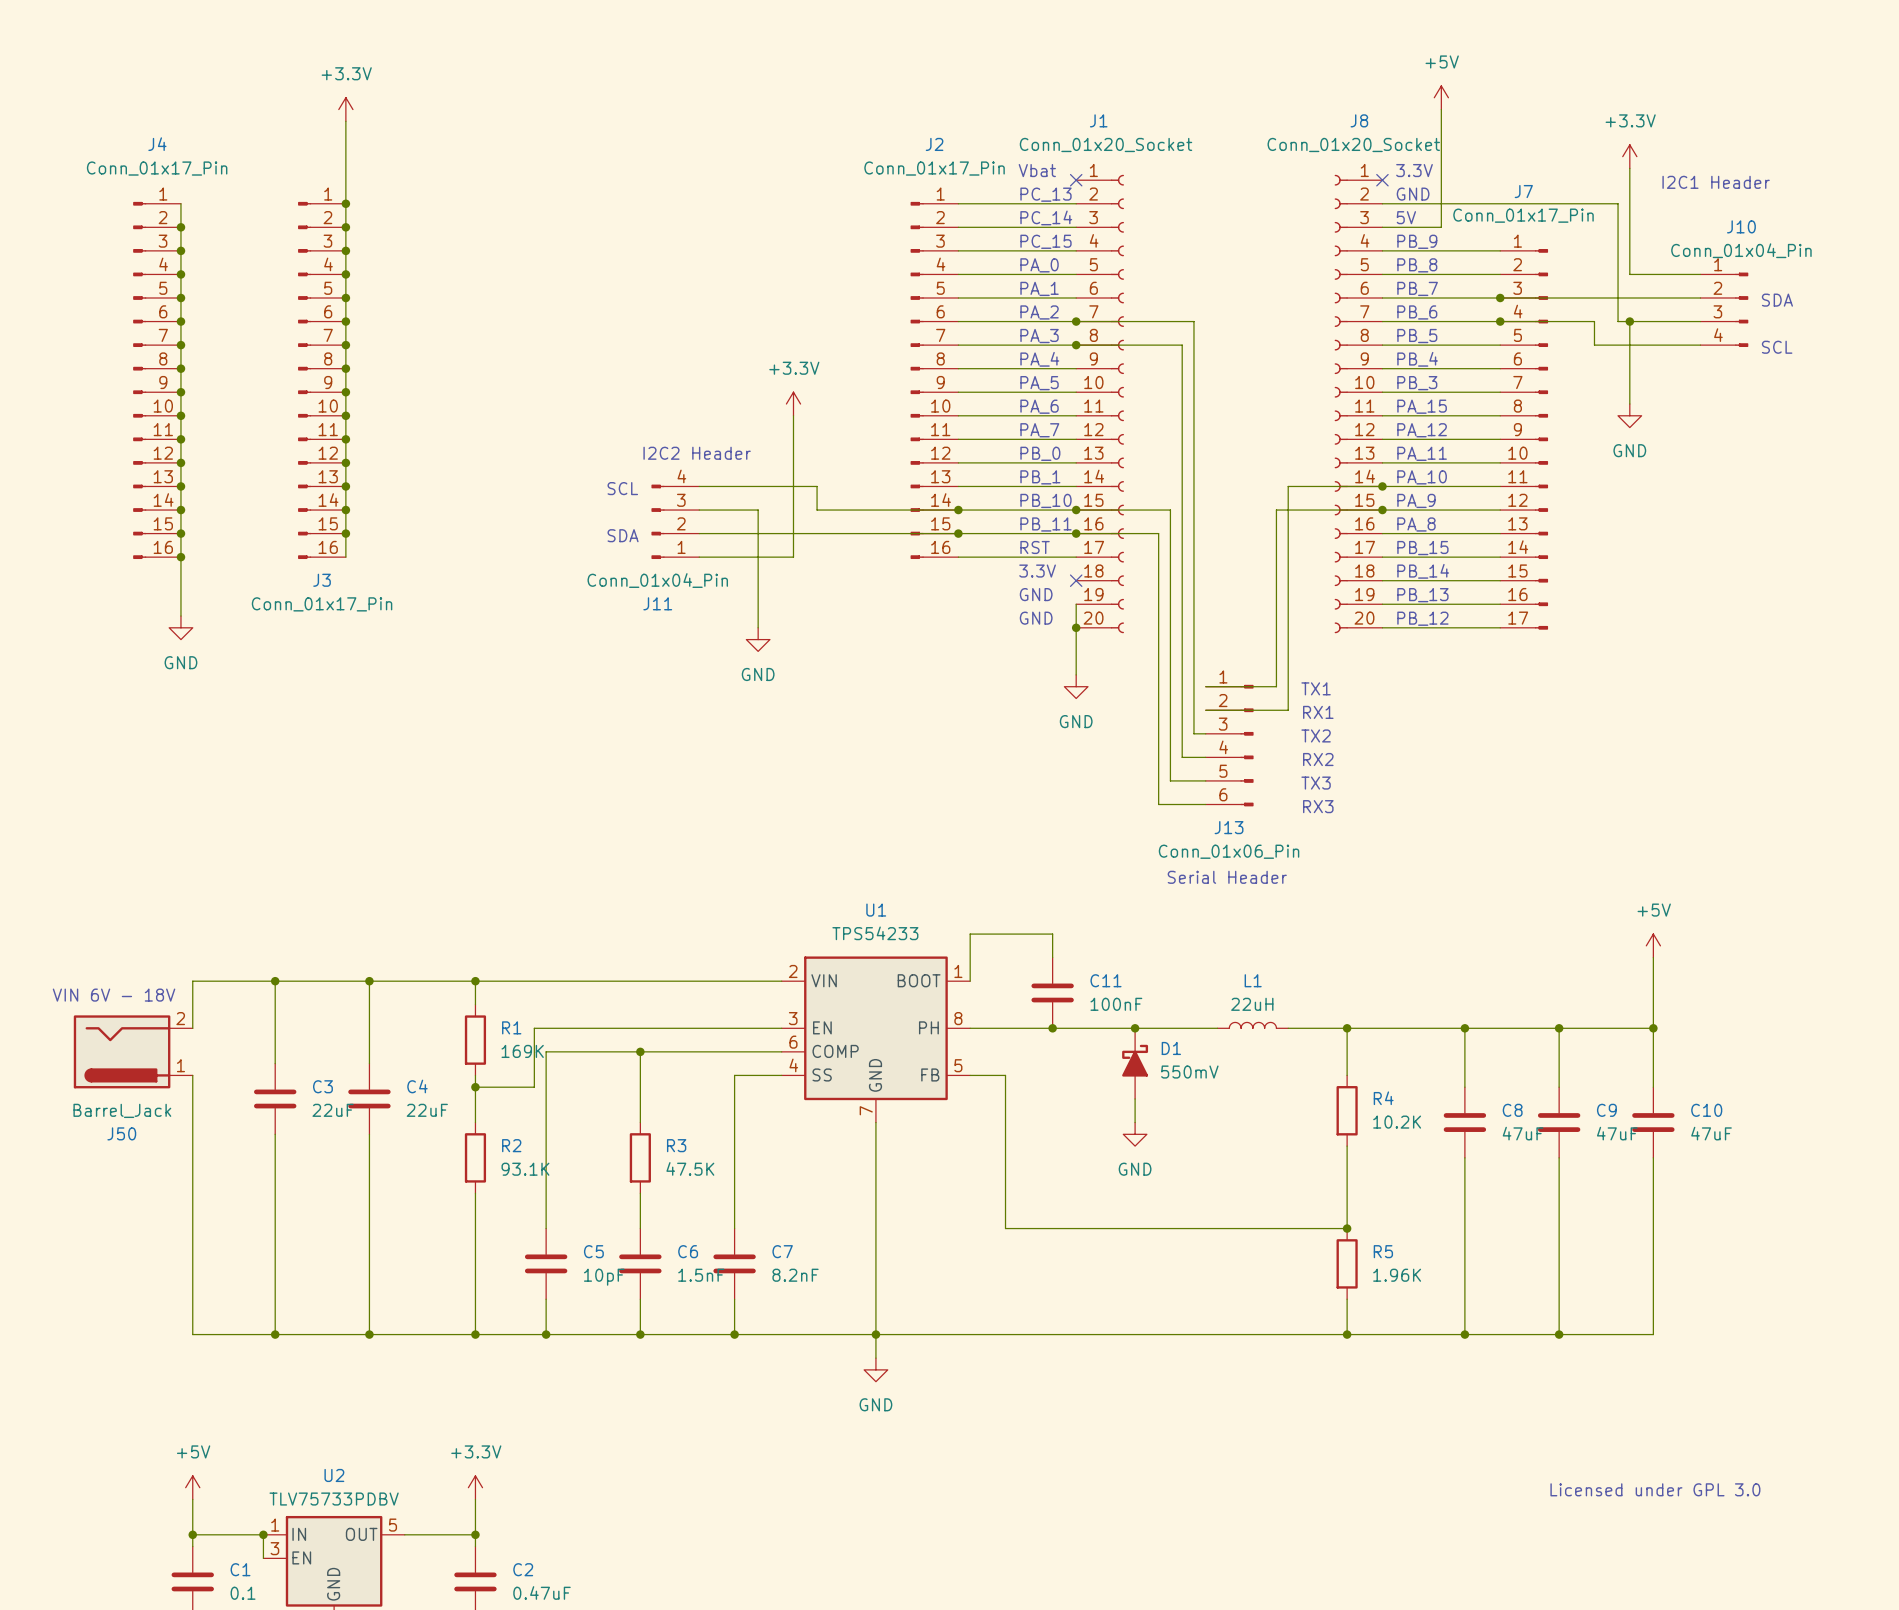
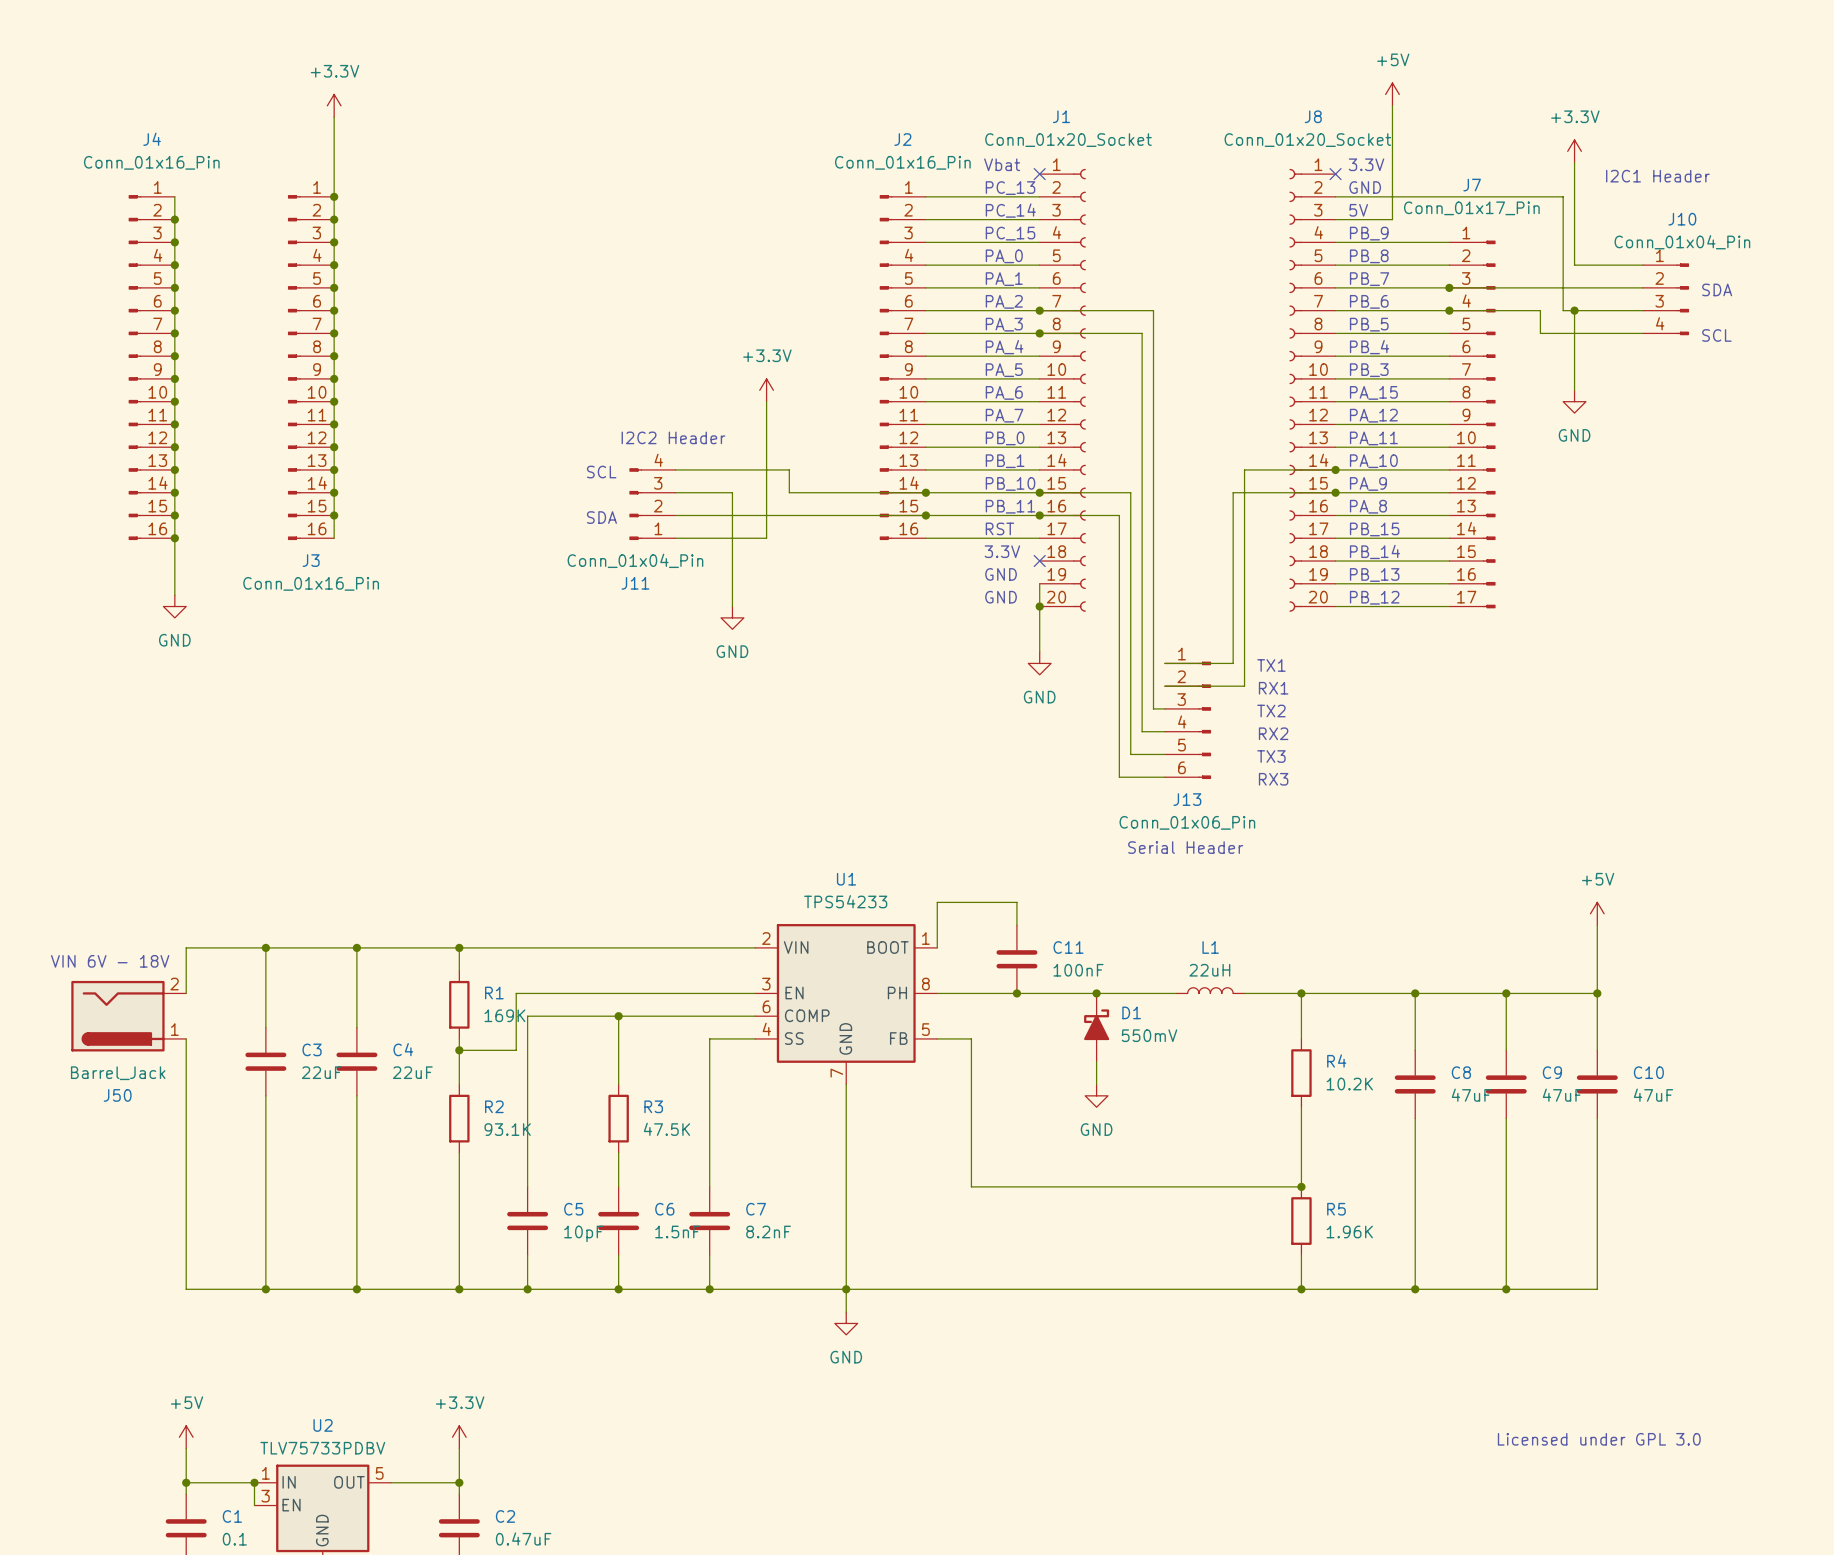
J4 value: Conn_01x17_Pin (157, 168) -> Conn_01x16_Pin (151, 162)
J2 value: Conn_01x17_Pin (934, 168) -> Conn_01x16_Pin (902, 162)
J3 value: Conn_01x17_Pin (322, 604) -> Conn_01x16_Pin (311, 583)

